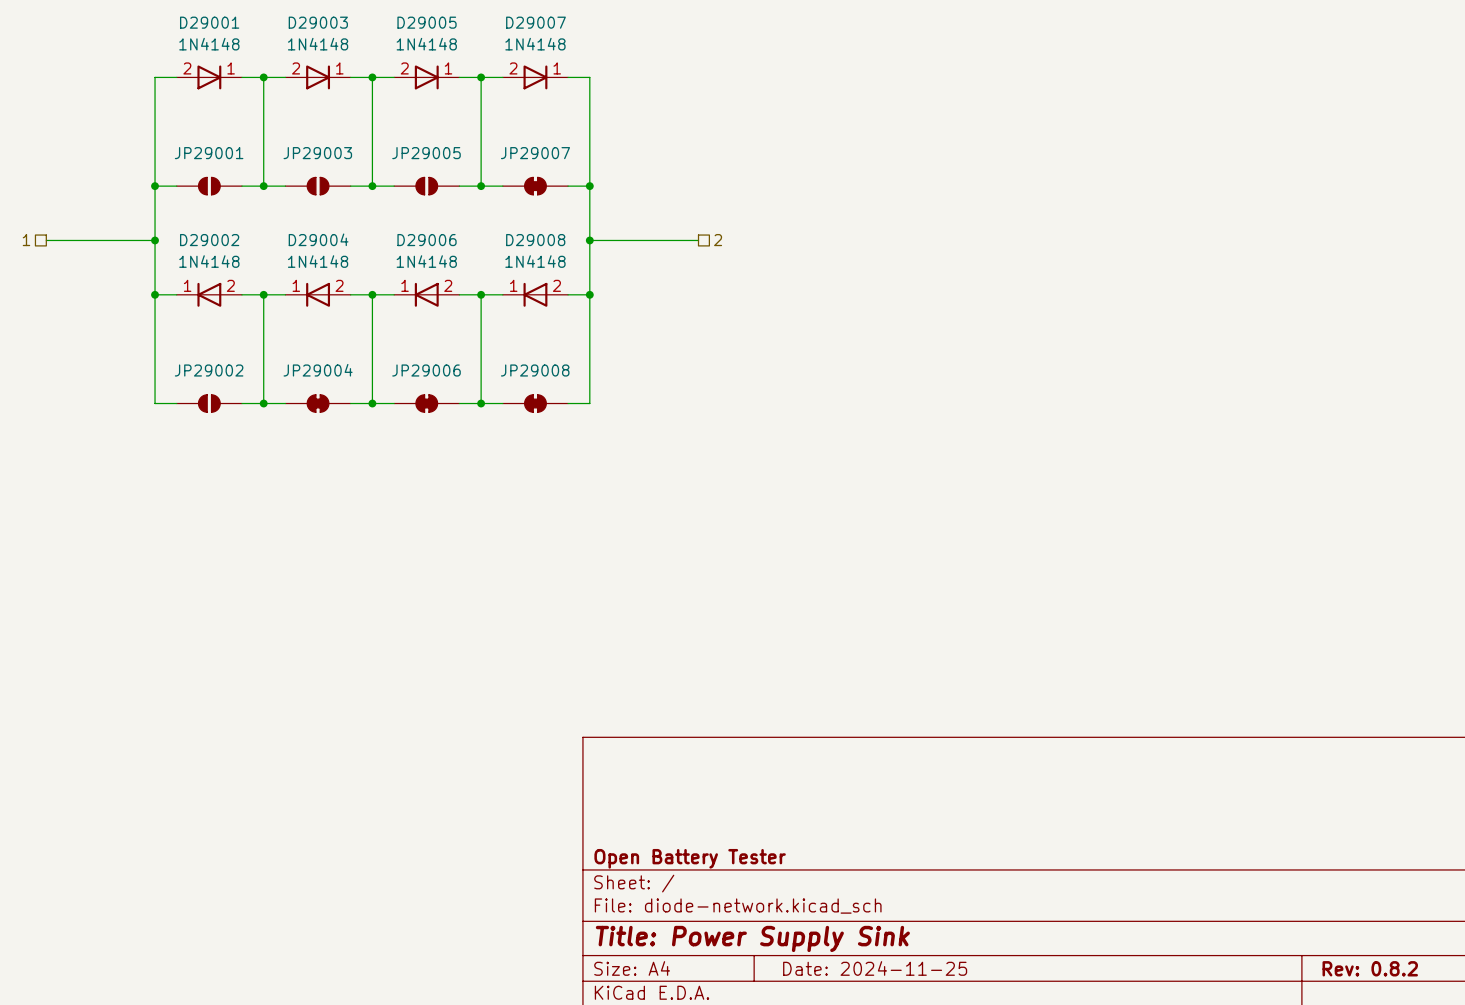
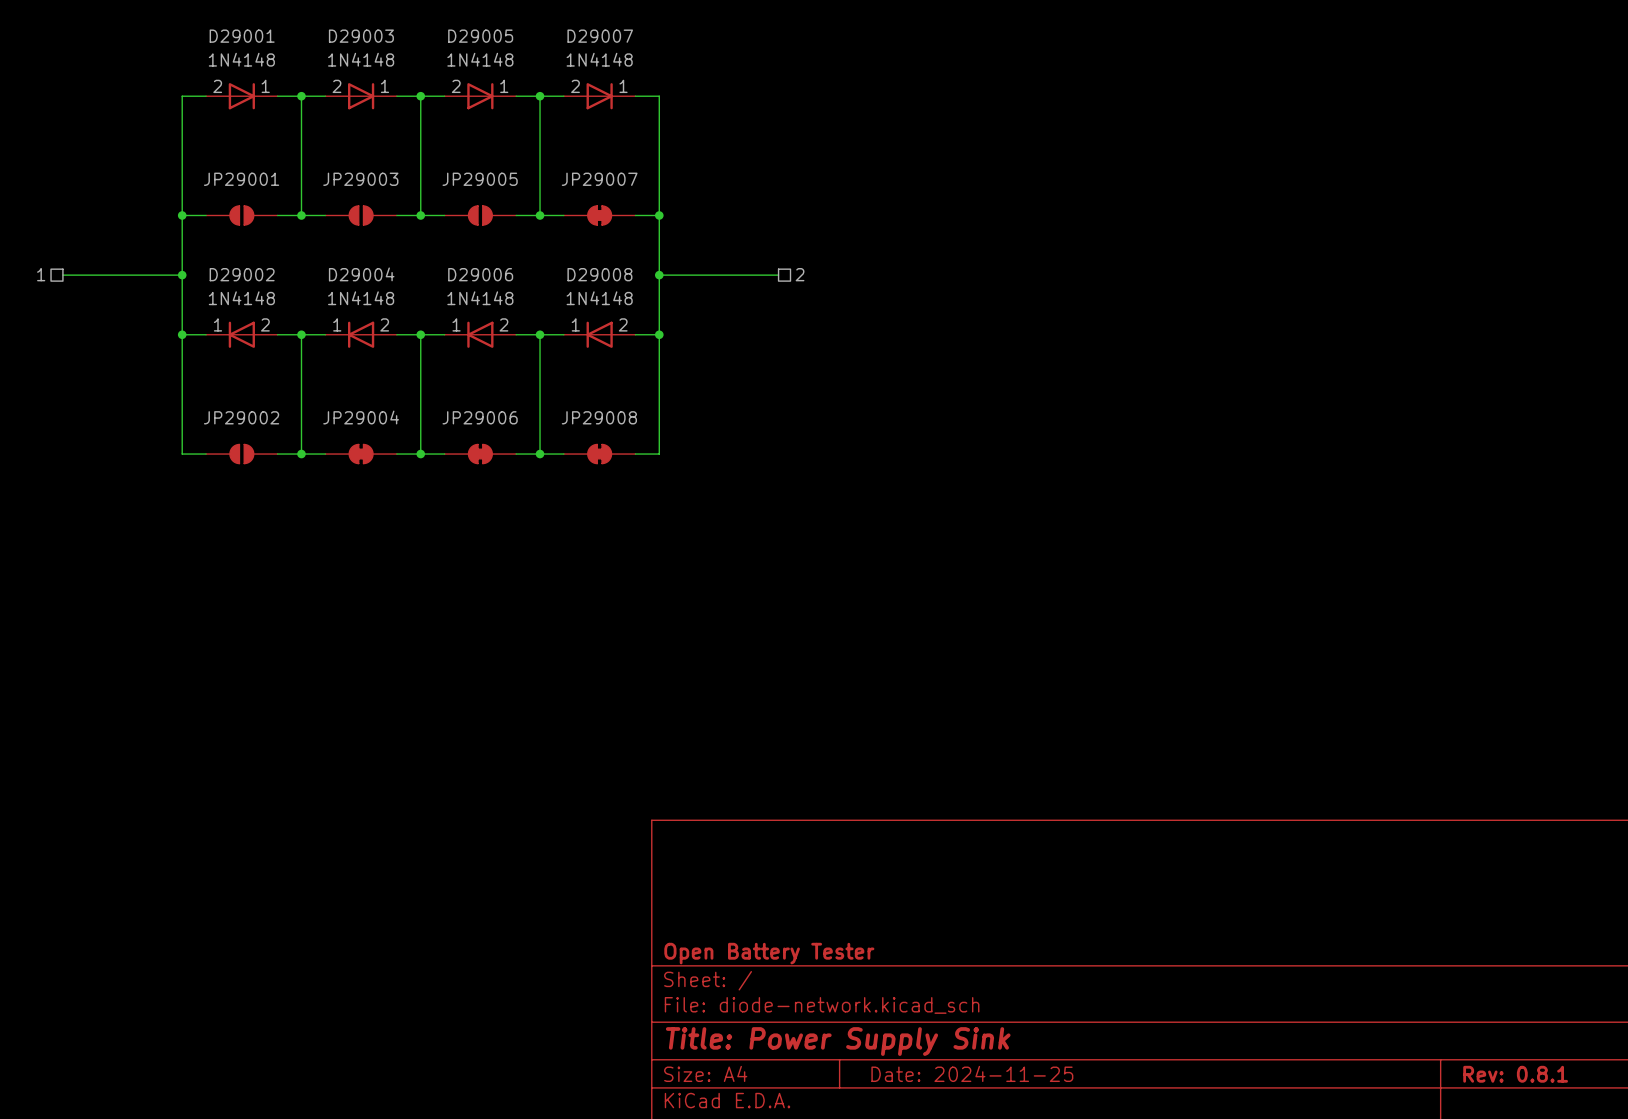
title block: Rev: 0.8.2 (1370, 968) -> Rev: 0.8.1 (1515, 1074)

